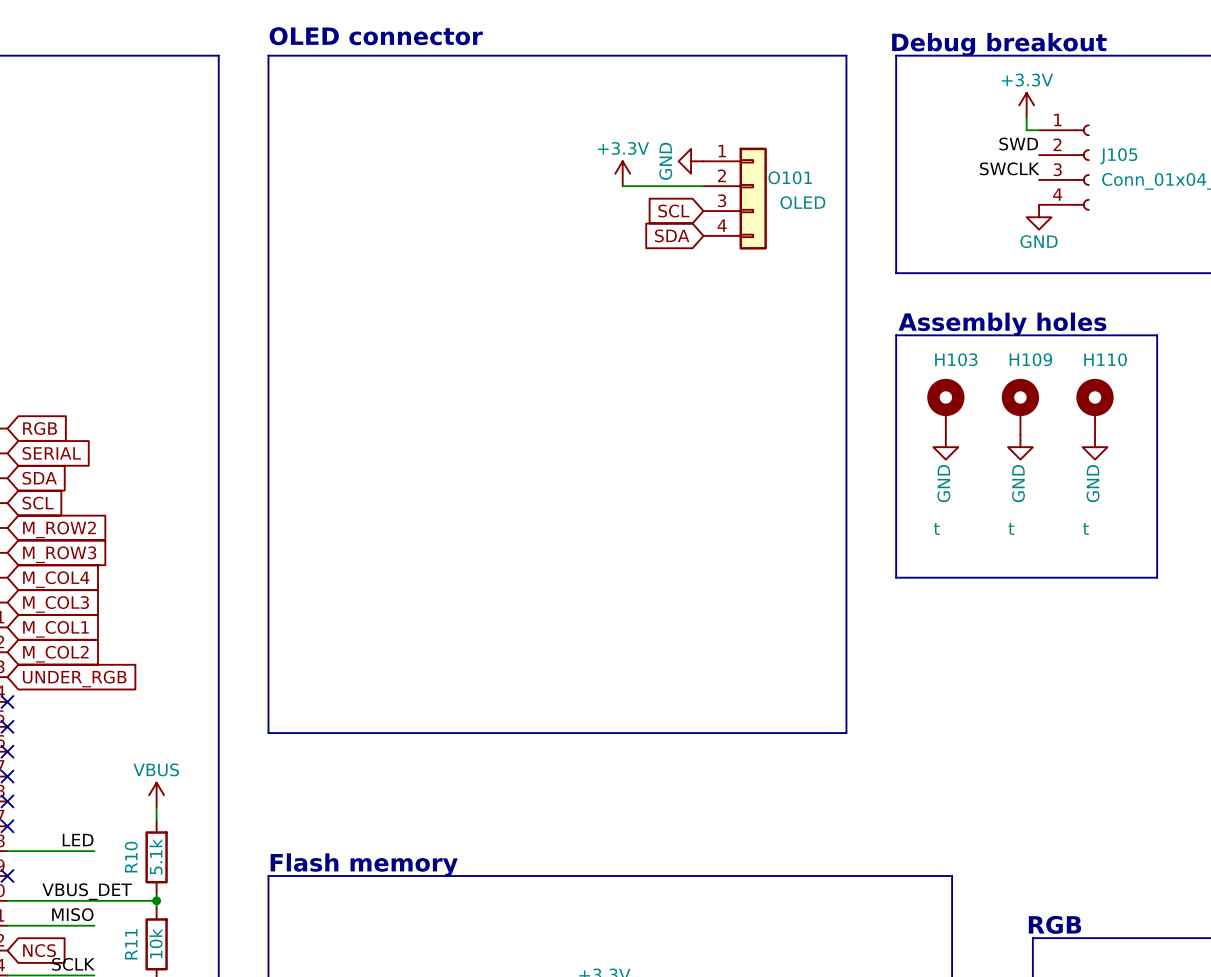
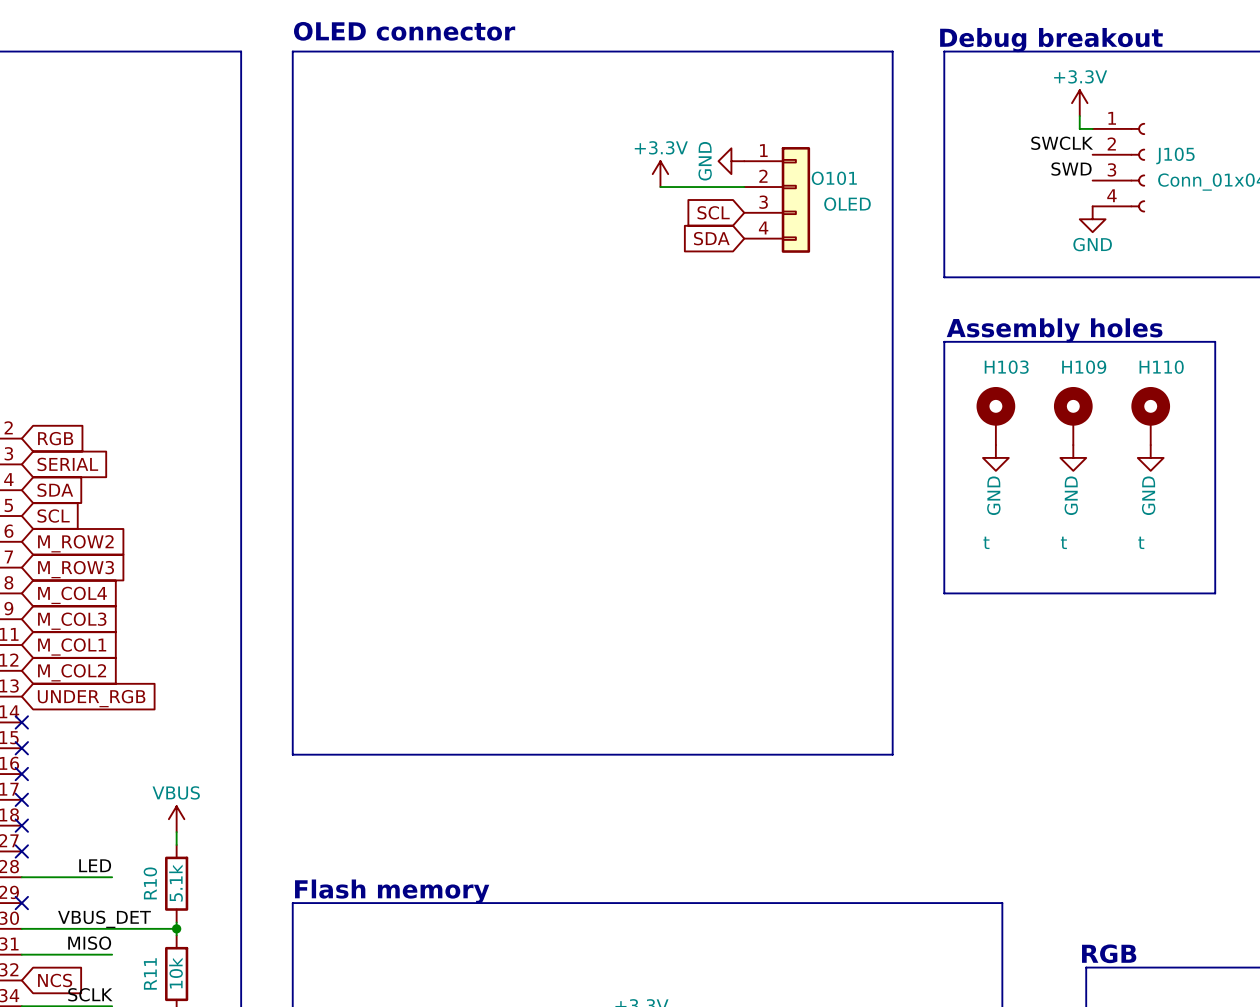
label: SWD (1018, 144) -> SWCLK (1062, 143)
label: SWCLK (1009, 168) -> SWD (1071, 169)

